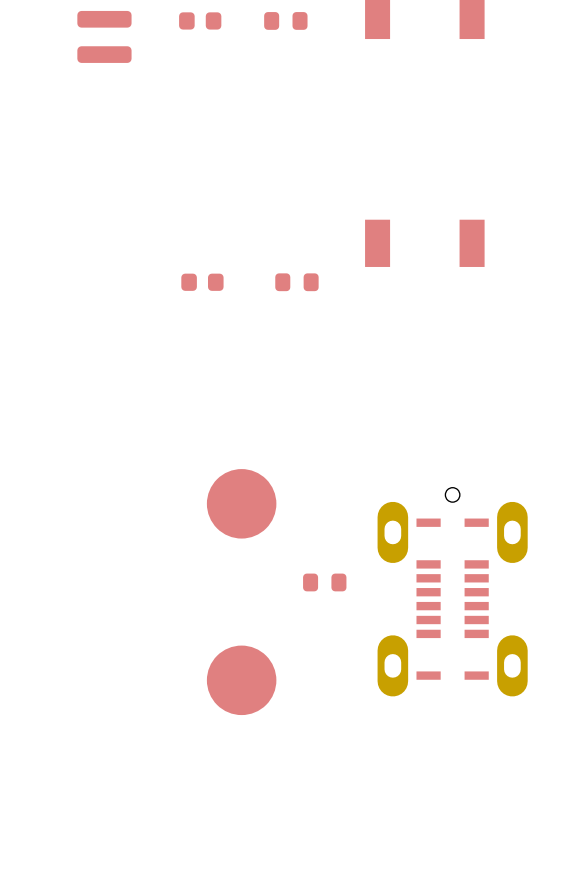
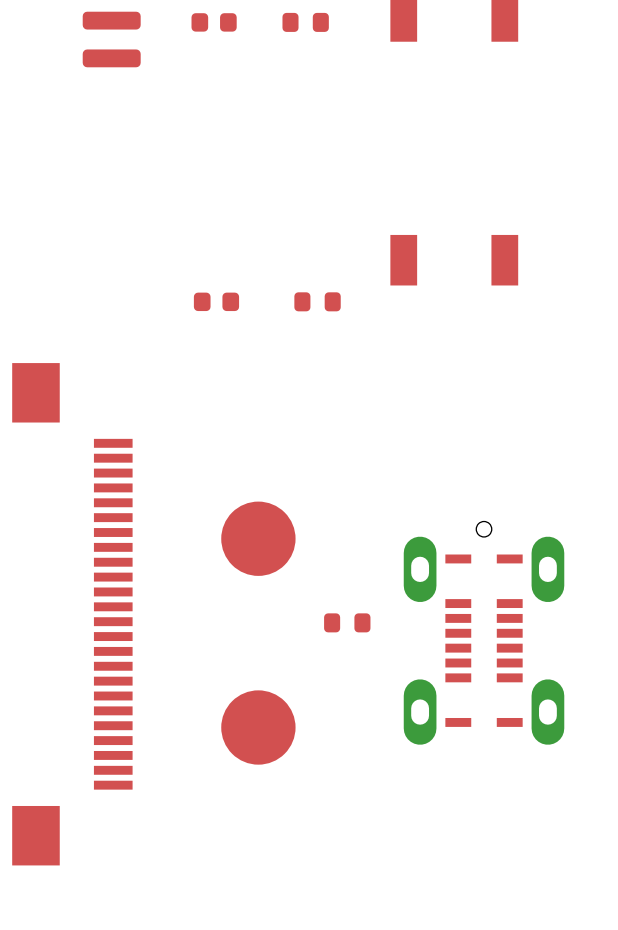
part: none -> (72, 614)

